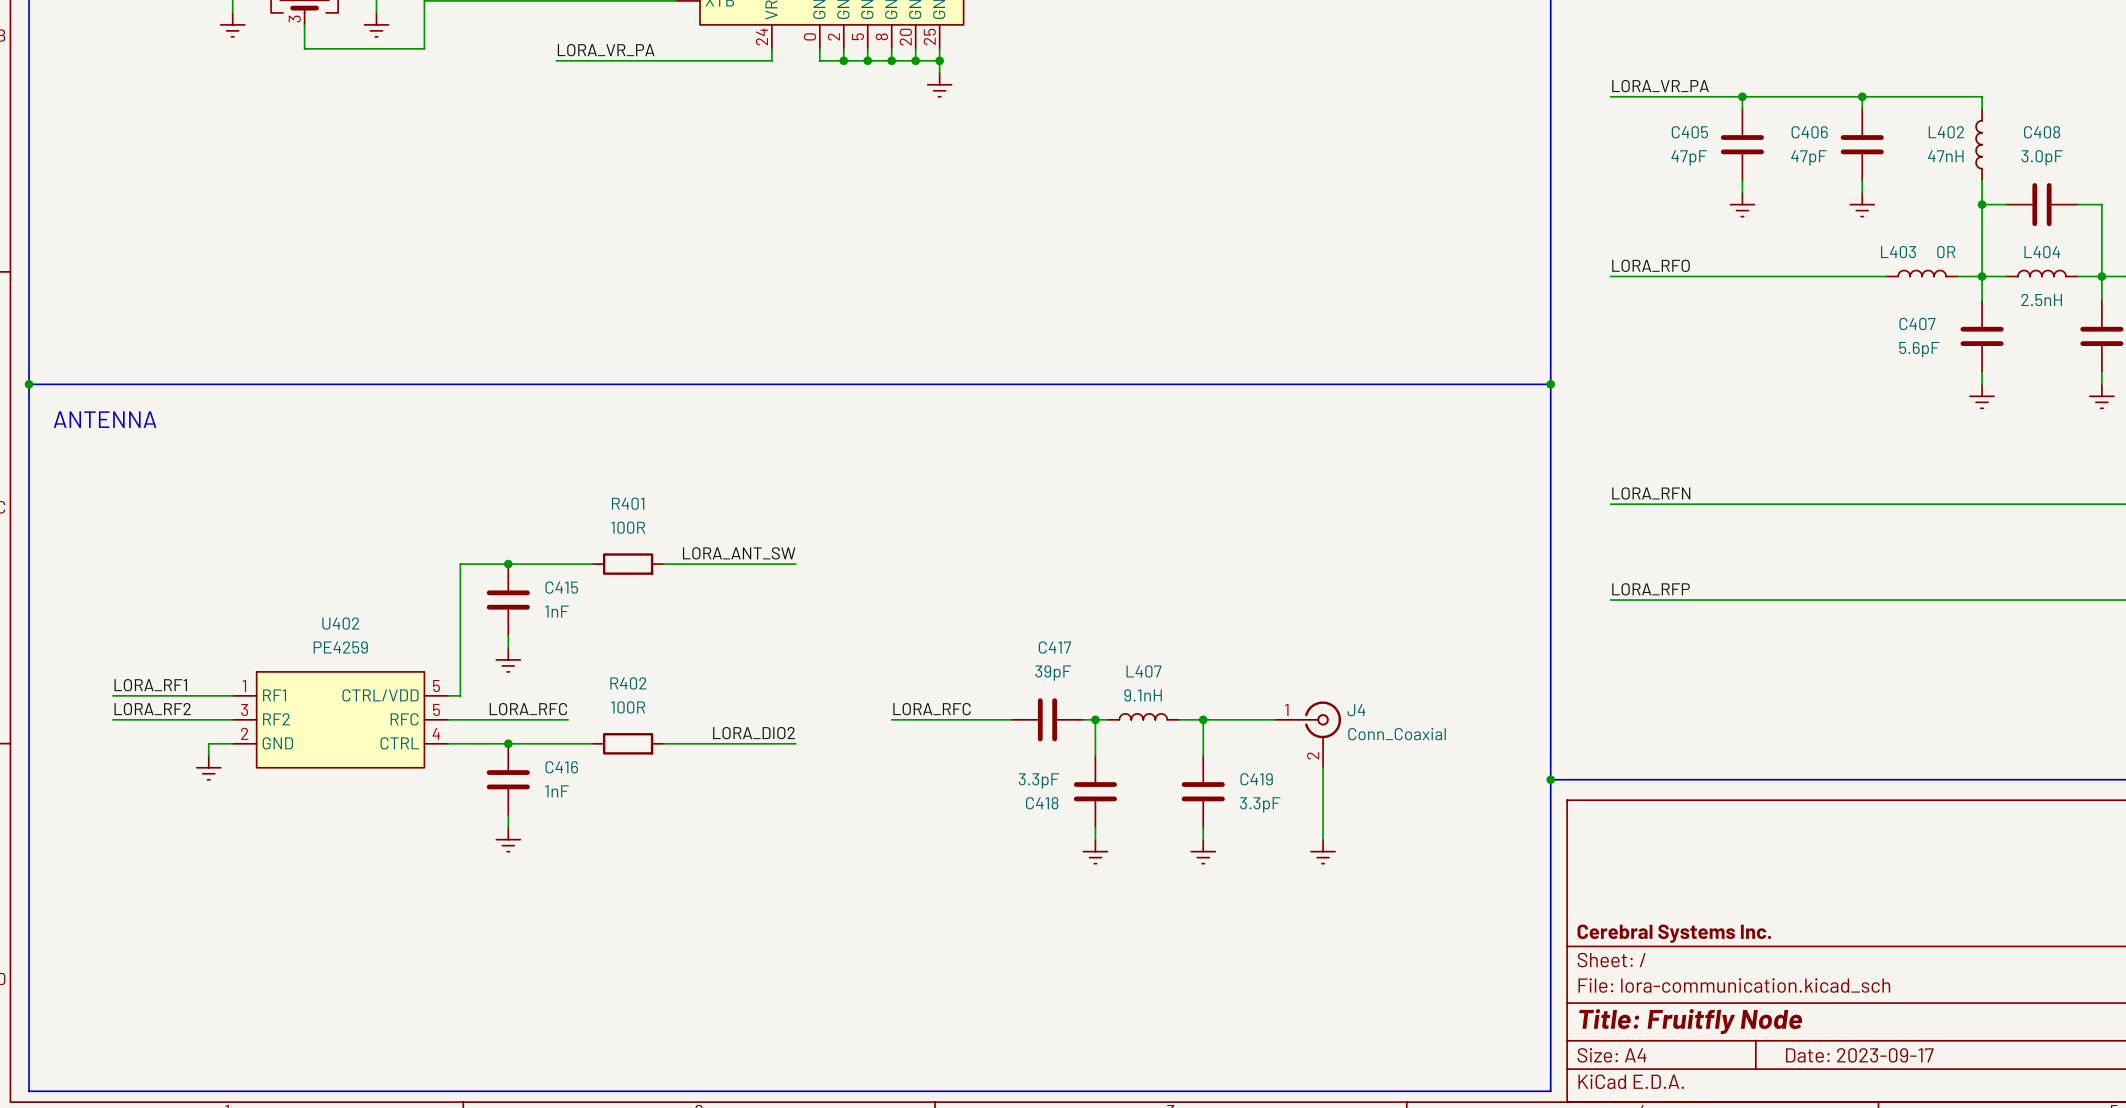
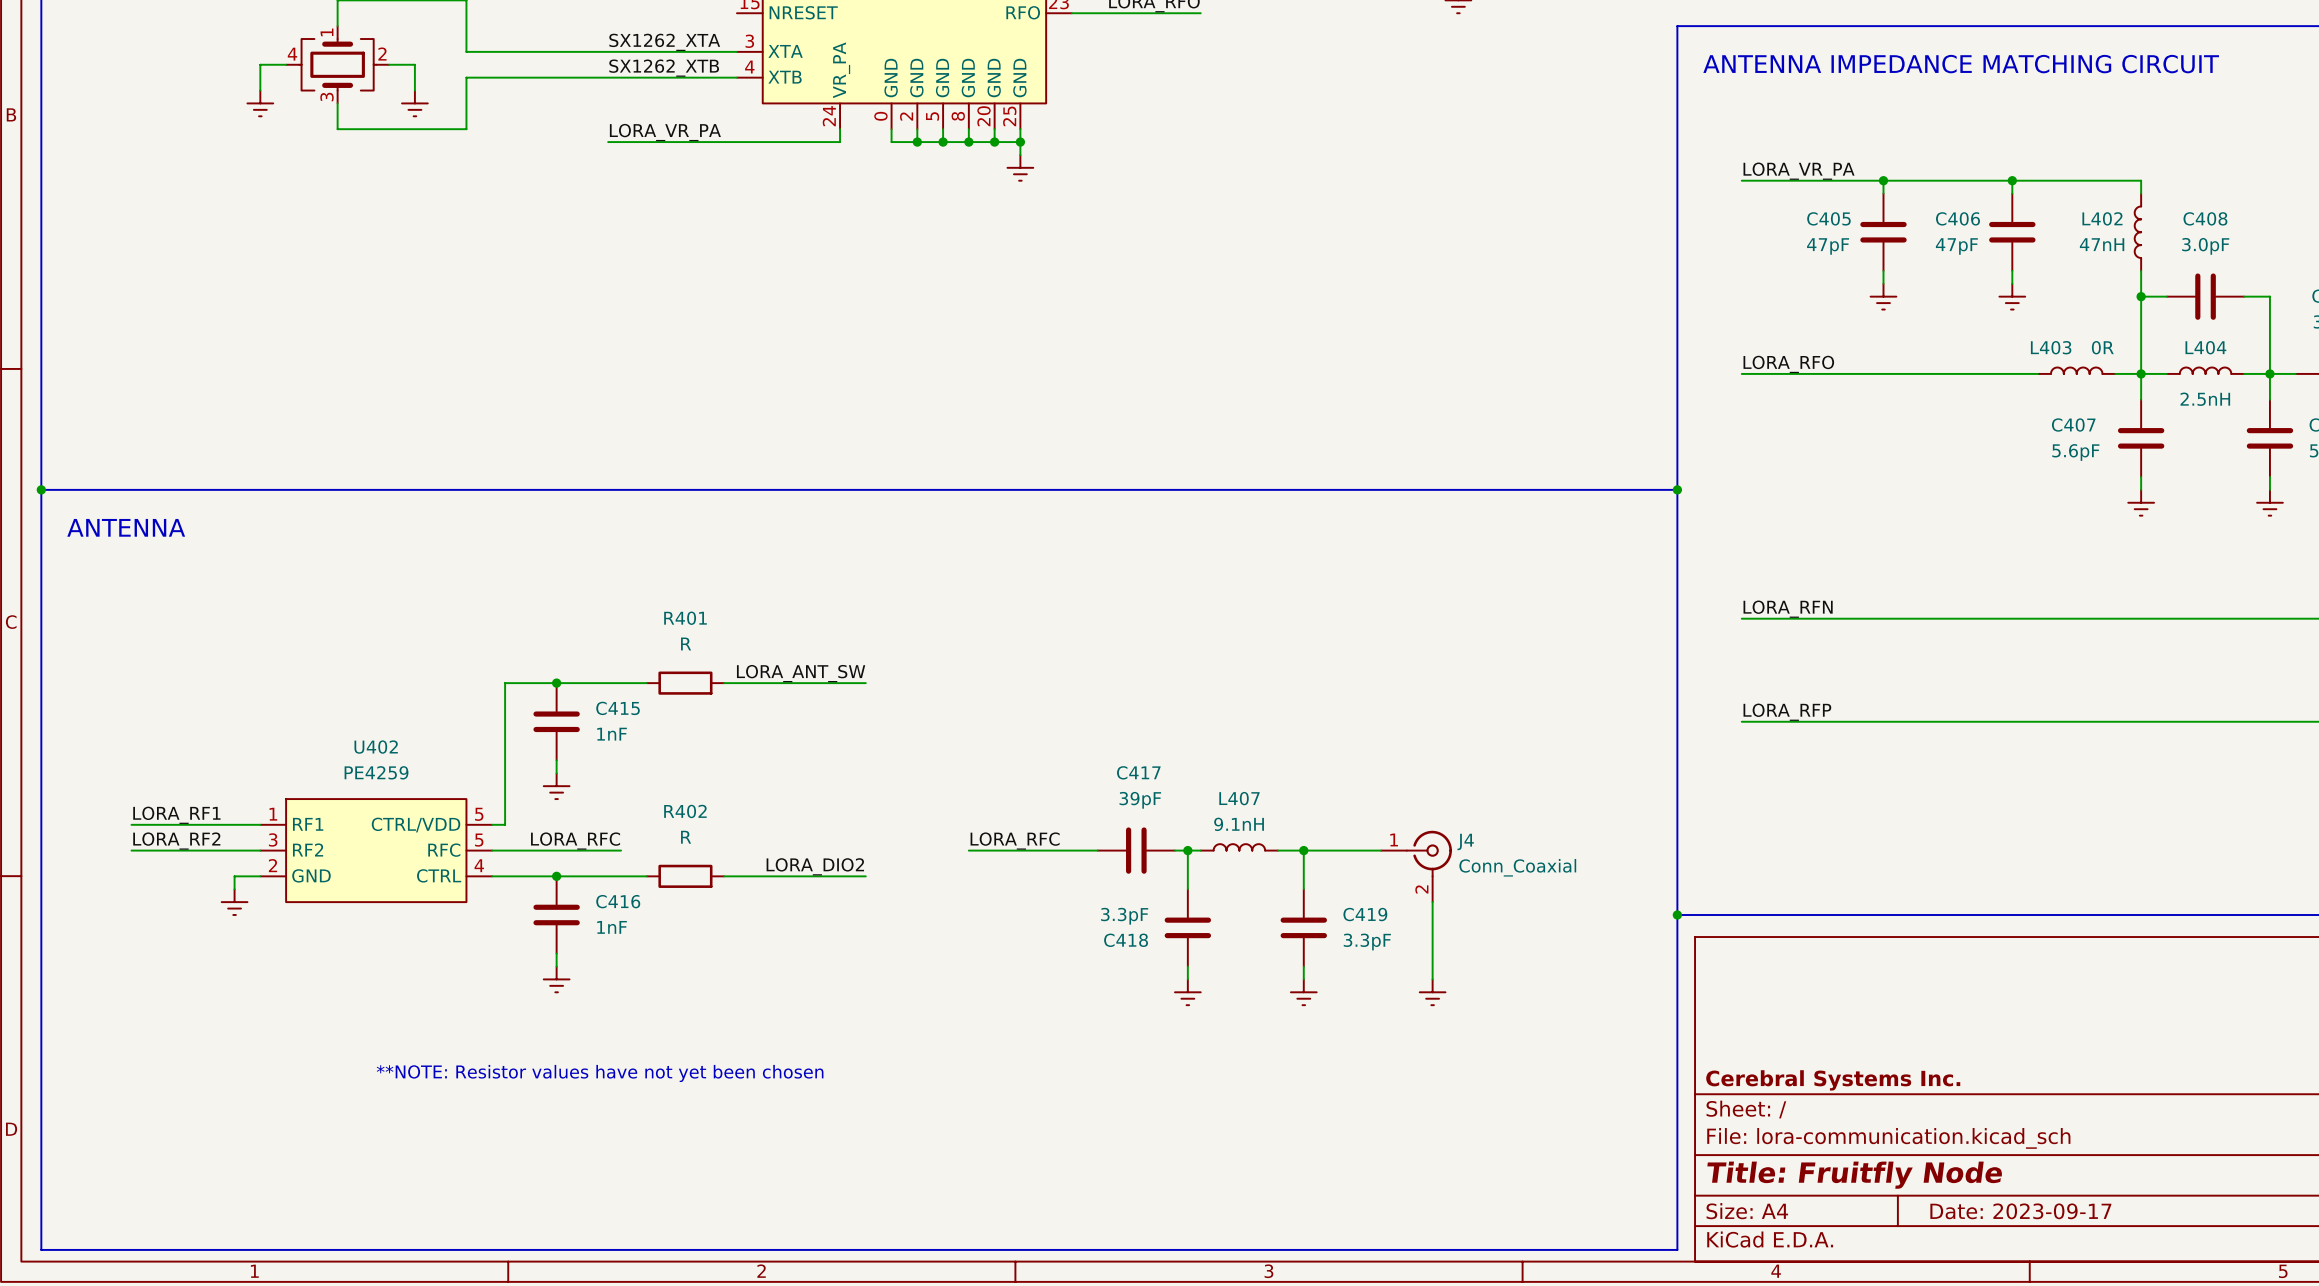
R401 value: 100R (628, 527) -> R (686, 643)
R402 value: 100R (628, 707) -> R (686, 837)
text: none -> **NOTE: Resistor values have not yet been chosen (600, 1073)

